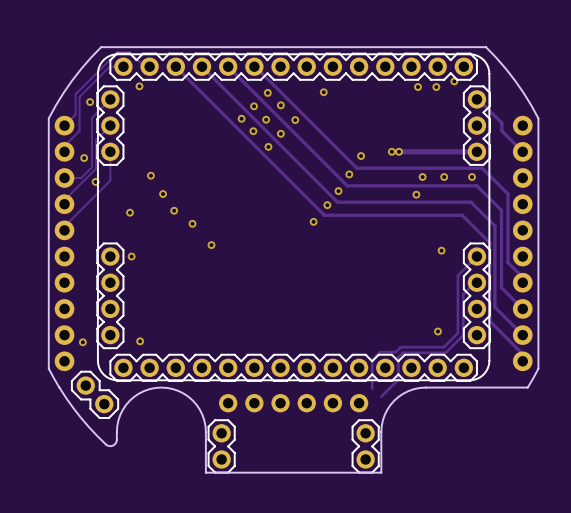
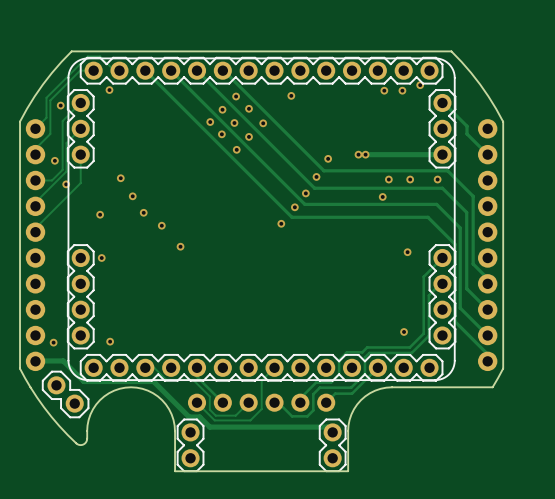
track: none -> (35, 361) (63, 360) (83, 381) (153, 381) (189, 417) (199, 417) (209, 427) (327, 427) (332, 432)
track: none -> (145, 367) (154, 367) (166, 379) (193, 379) (209, 396) (209, 409) (215, 415) (235, 415) (248, 402)
track: none -> (197, 367) (197, 376) (222, 402)
track: none -> (274, 367) (261, 380) (261, 409) (250, 420) (214, 420) (197, 402)
track: none -> (377, 367) (352, 393) (335, 393) (326, 402)
track: (372, 374) (372, 388) -> (339, 374) (331, 382) (316, 382) (300, 398) (300, 402)
track: (398, 374) (398, 379) (381, 396) -> (364, 373) (351, 387) (319, 387) (313, 394) (313, 410) (307, 416) (292, 416) (278, 402) (274, 402)

